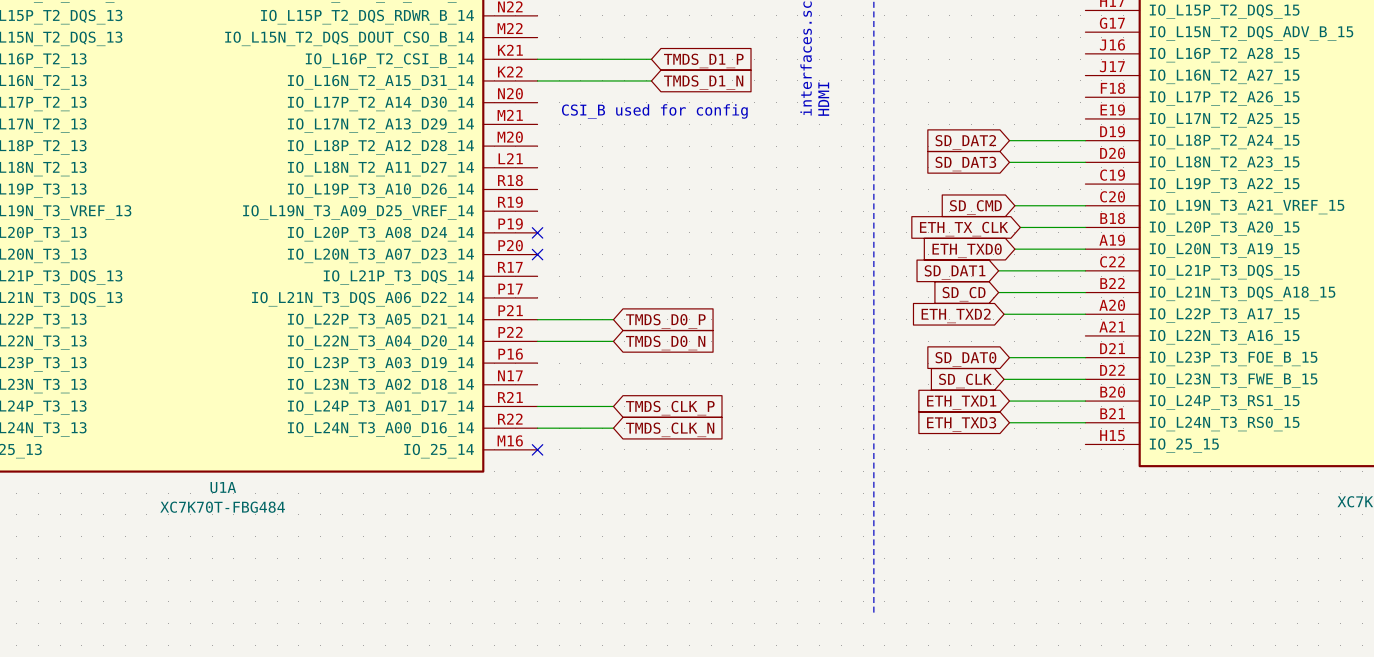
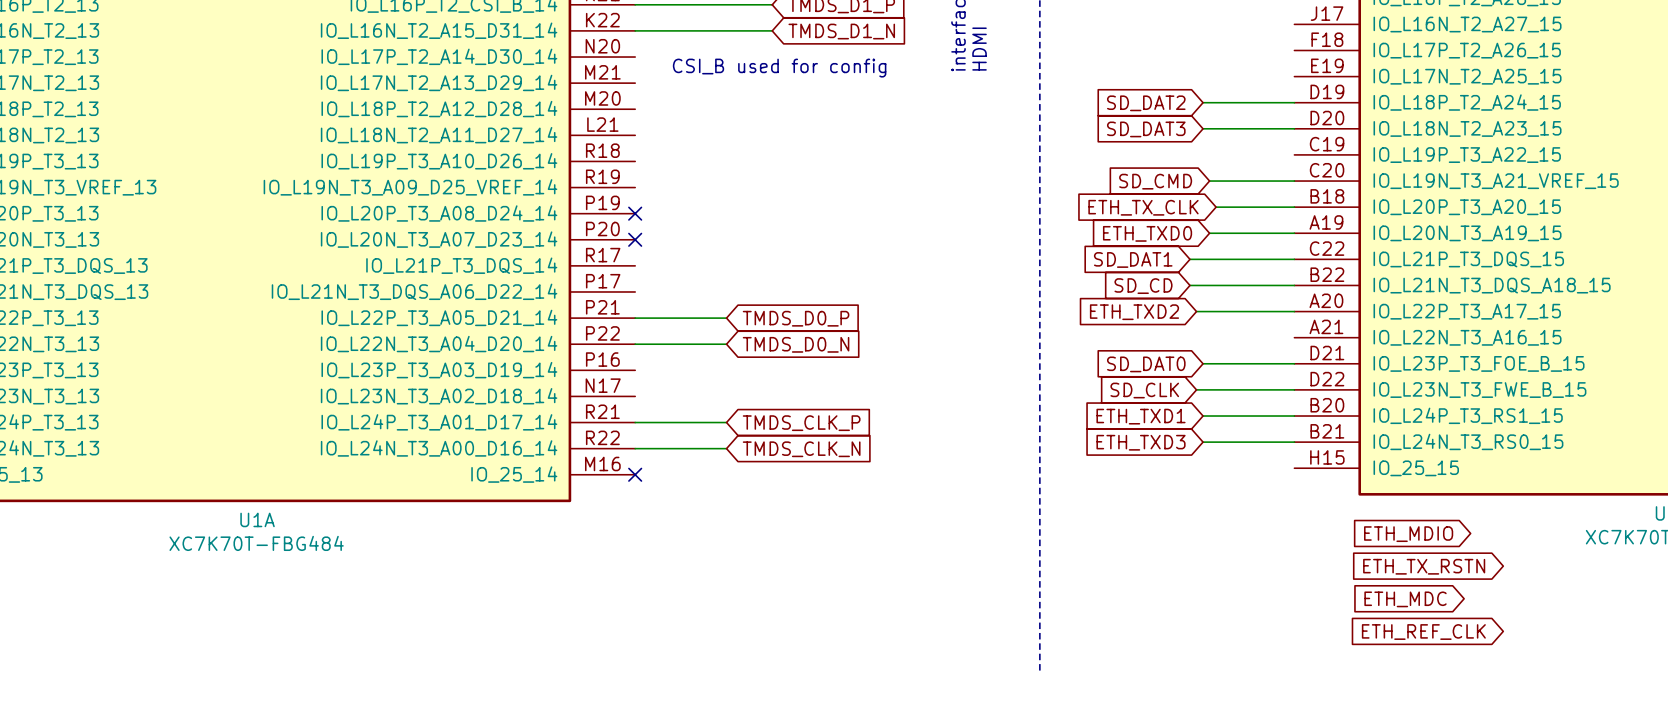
global label: none -> ETH_MDIO (1408, 534)
global label: none -> ETH_TX_RSTN (1424, 566)
global label: none -> ETH_MDC (1405, 599)
global label: none -> ETH_REF_CLK (1423, 632)

